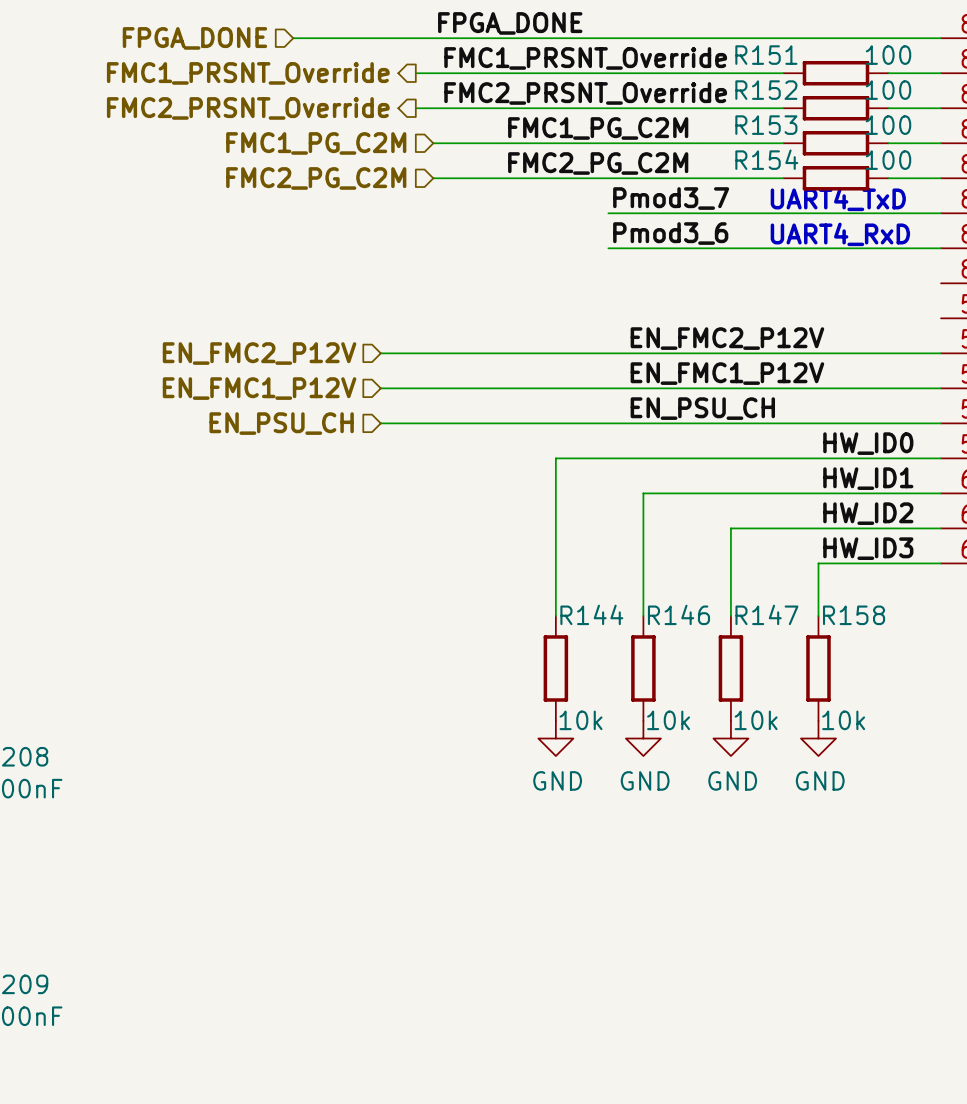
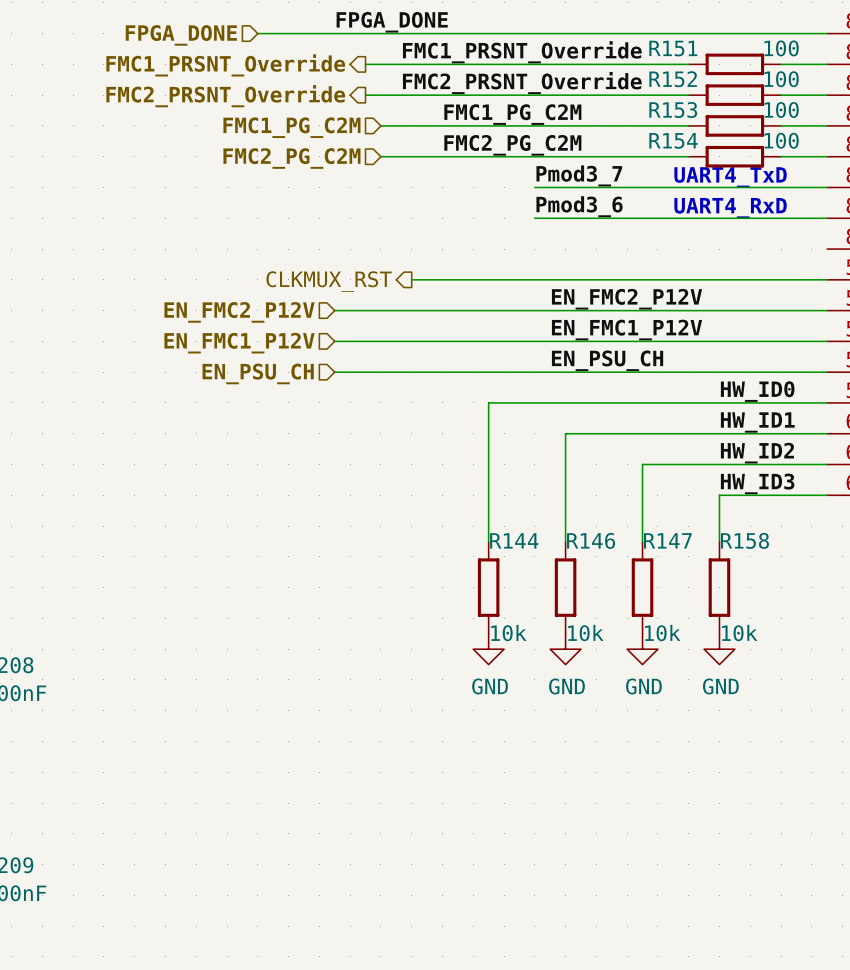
label position: FPGA_DONE (510, 23) -> FPGA_DONE (392, 22)
hierarchical label: none -> CLKMUX_RST (329, 281)
wire: none -> (411, 279) (827, 279)

